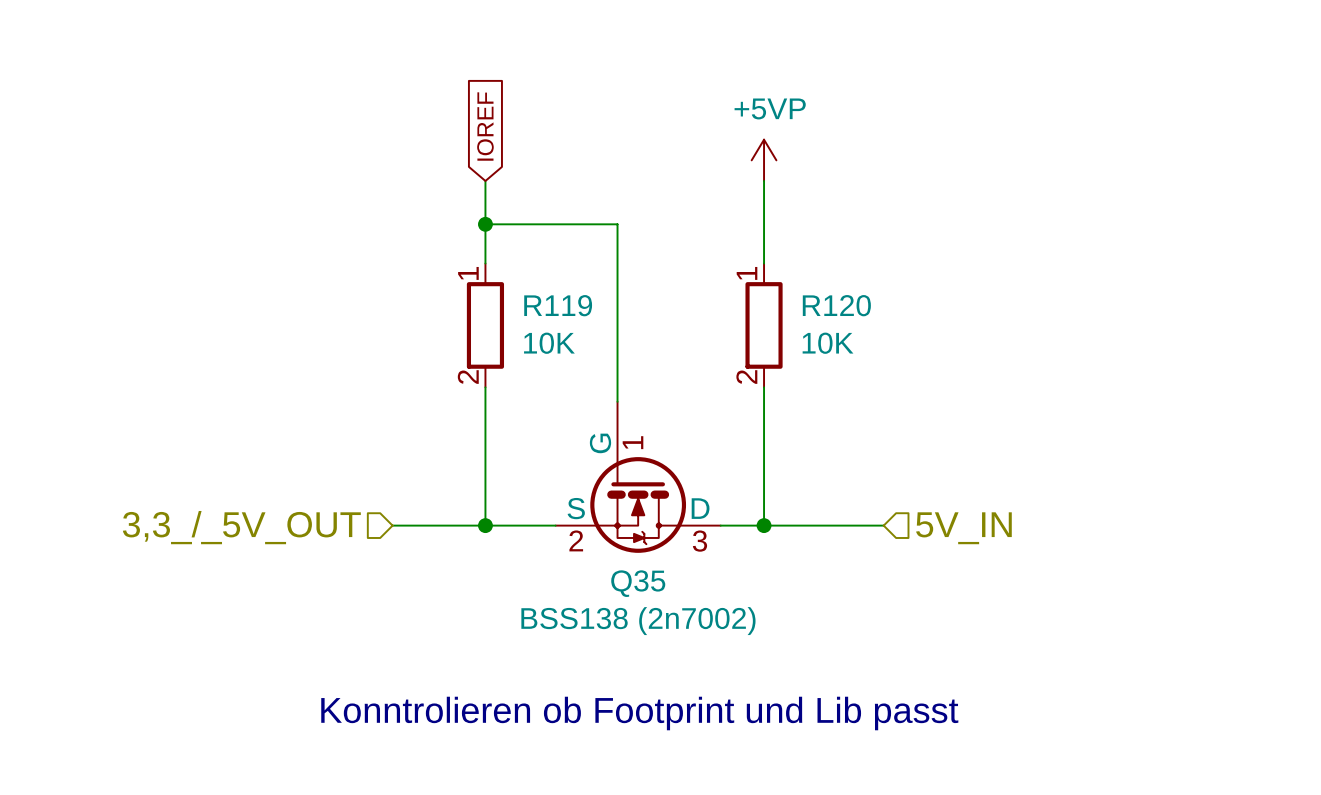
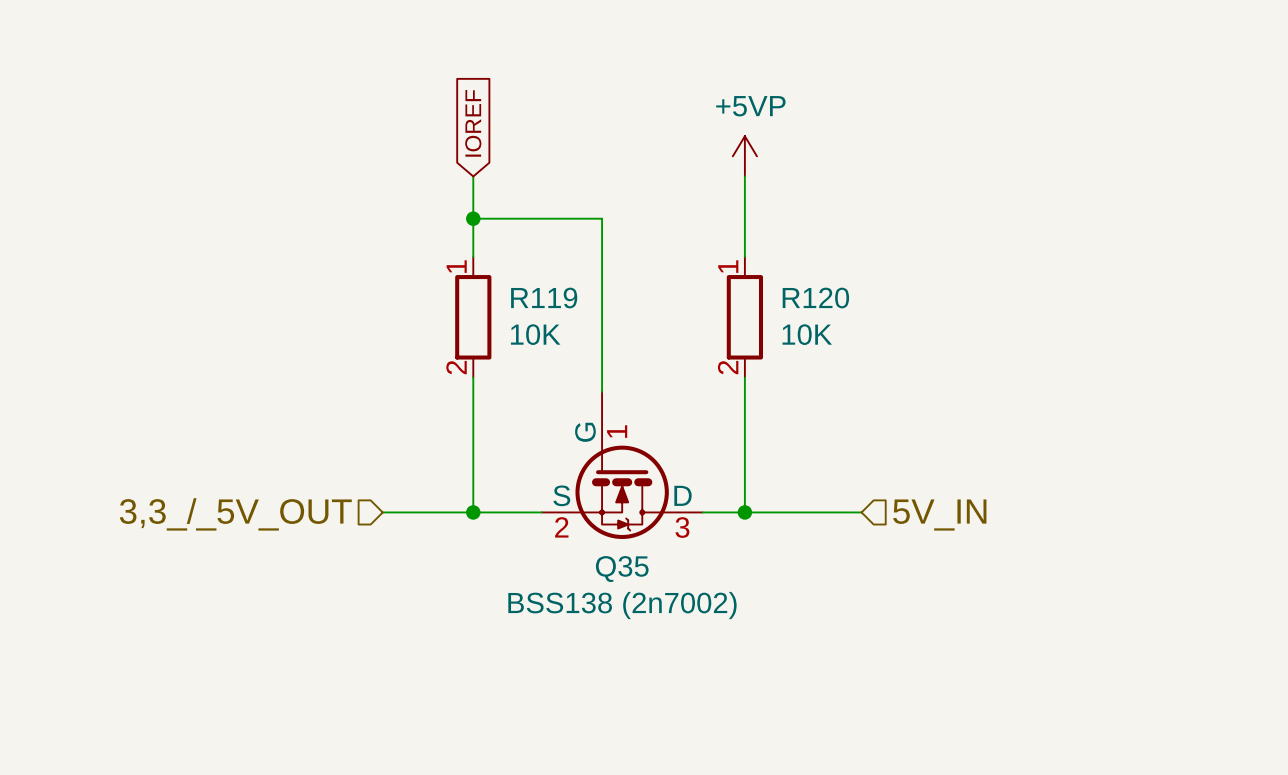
text: Konntrolieren ob Footprint und Lib passt (639, 713) -> none

